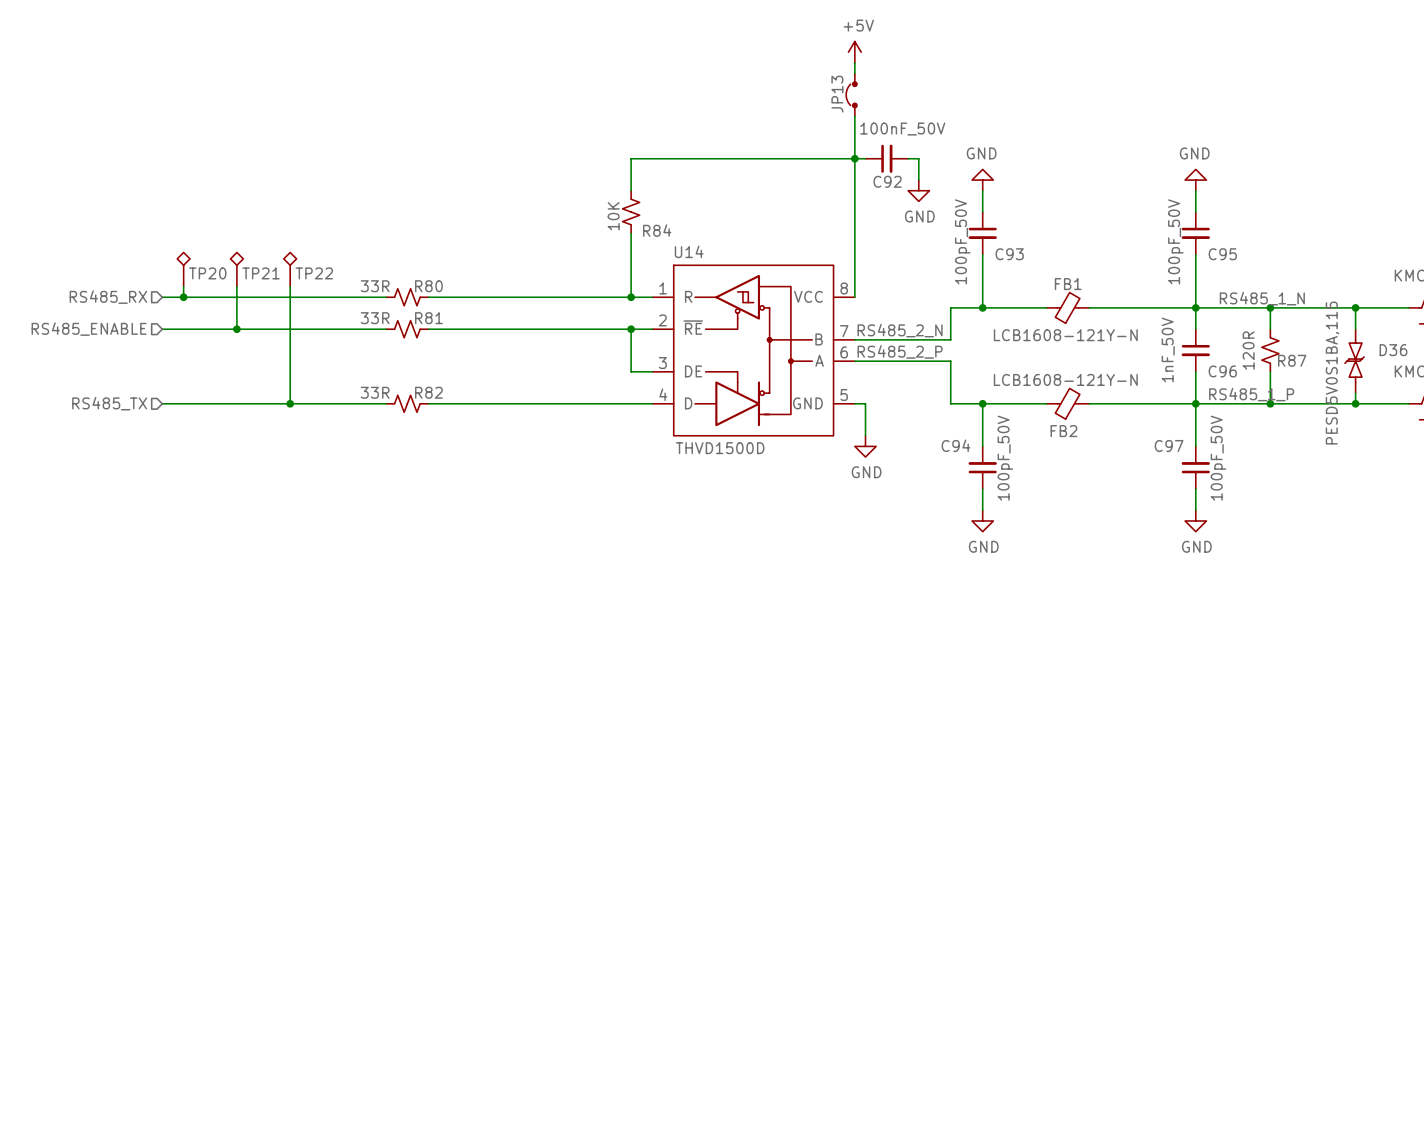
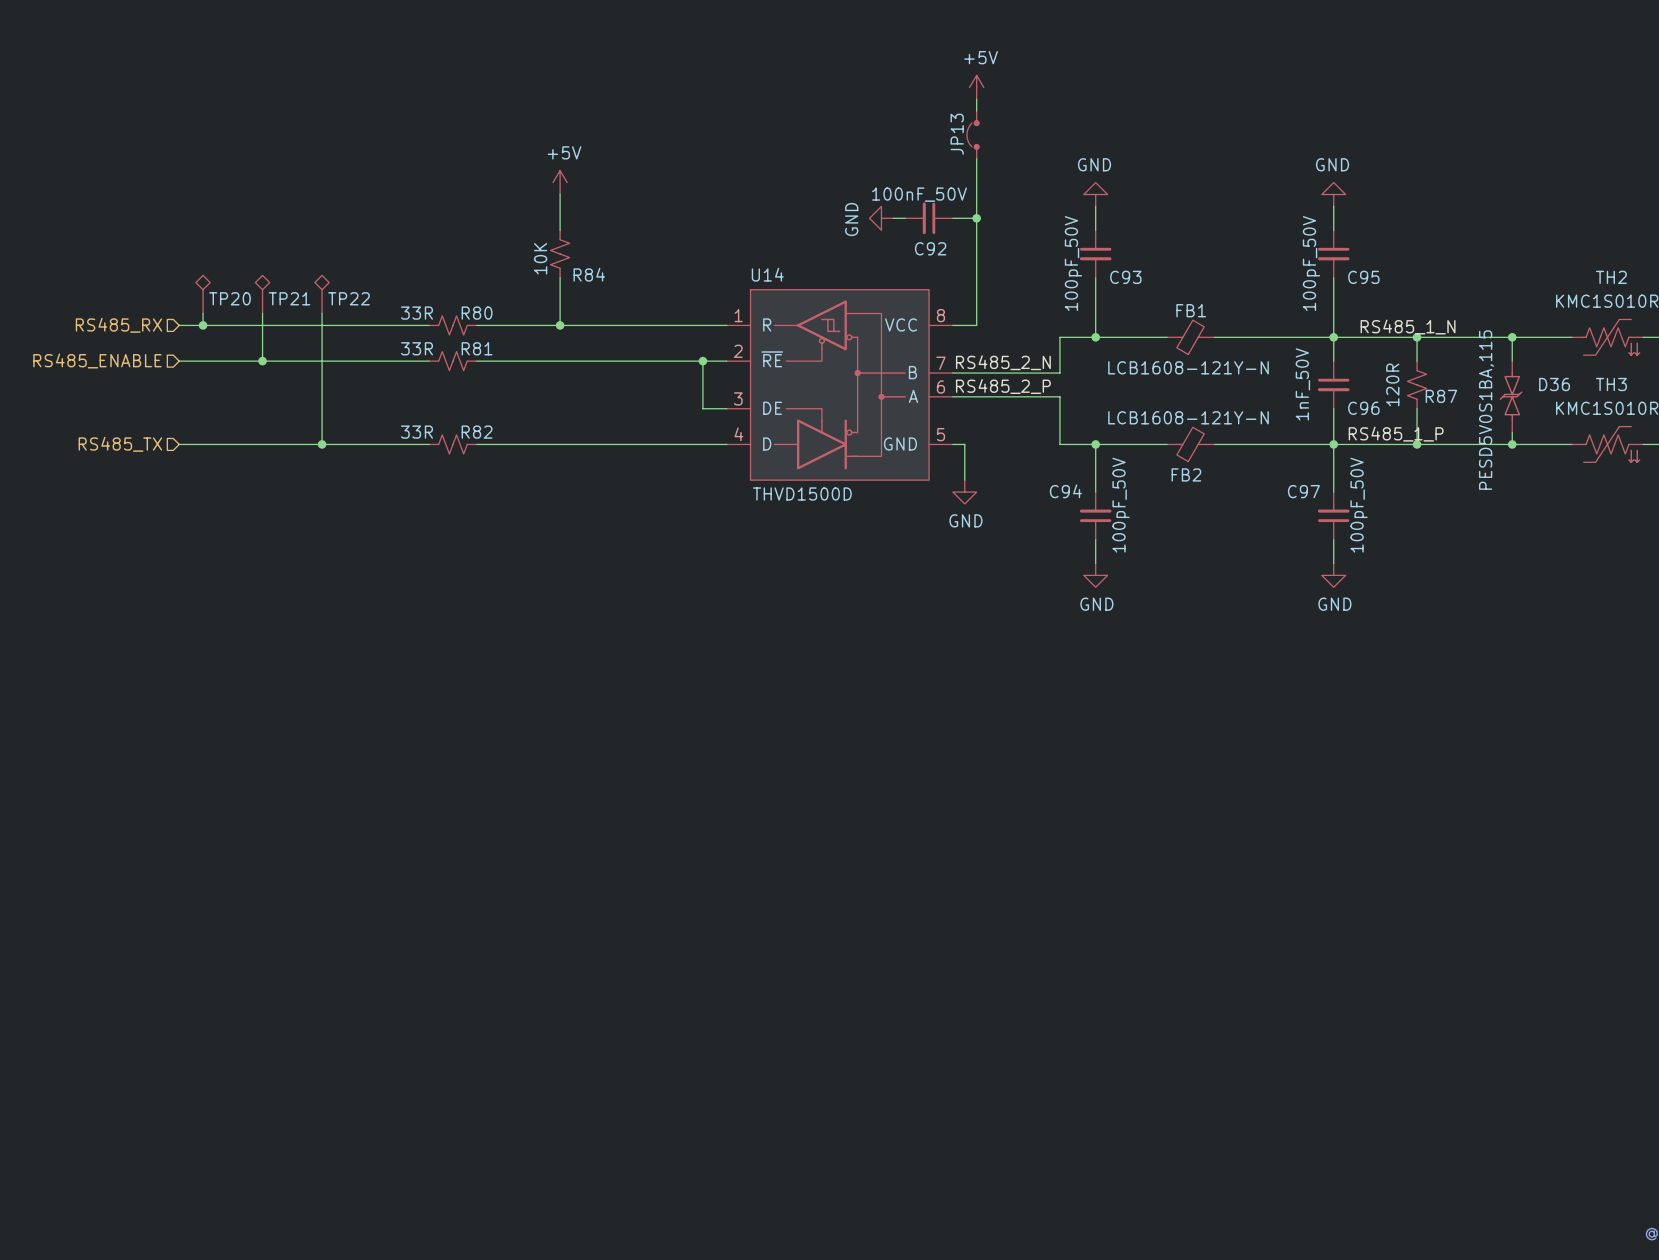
power symbol position: +5V (854, 52) -> +5V (976, 87)
wire: (854, 62) (854, 73) -> (976, 99) (976, 111)
JP13 position: (851, 94) -> (973, 134)
wire: (854, 116) (854, 297) -> (976, 158) (976, 325) (952, 325)
C92 value position: 100nF_50V (902, 129) -> 100nF_50V (919, 194)
junction position: (854, 158) -> (976, 218)
wire: (865, 158) (631, 158) (631, 190) -> none
C92 rotation: 0° (886, 158) -> 180° (929, 218)
C92 position: (886, 158) -> (929, 218)
wire: (908, 158) (918, 158) (918, 180) -> none
power symbol: none -> +5V (560, 182)
wire: none -> (560, 194) (560, 230)
power symbol rotation: 0° (918, 190) -> 90° clockwise (881, 218)
power symbol position: GND (918, 190) -> GND (881, 218)
wire: none -> (893, 218) (905, 218)
wire: none -> (952, 218) (976, 218)
R84 position: (631, 212) -> (560, 254)
wire: (631, 233) (631, 297) -> none
wire: none -> (560, 277) (560, 325)
junction: none -> (560, 325)
junction: (631, 297) -> none

